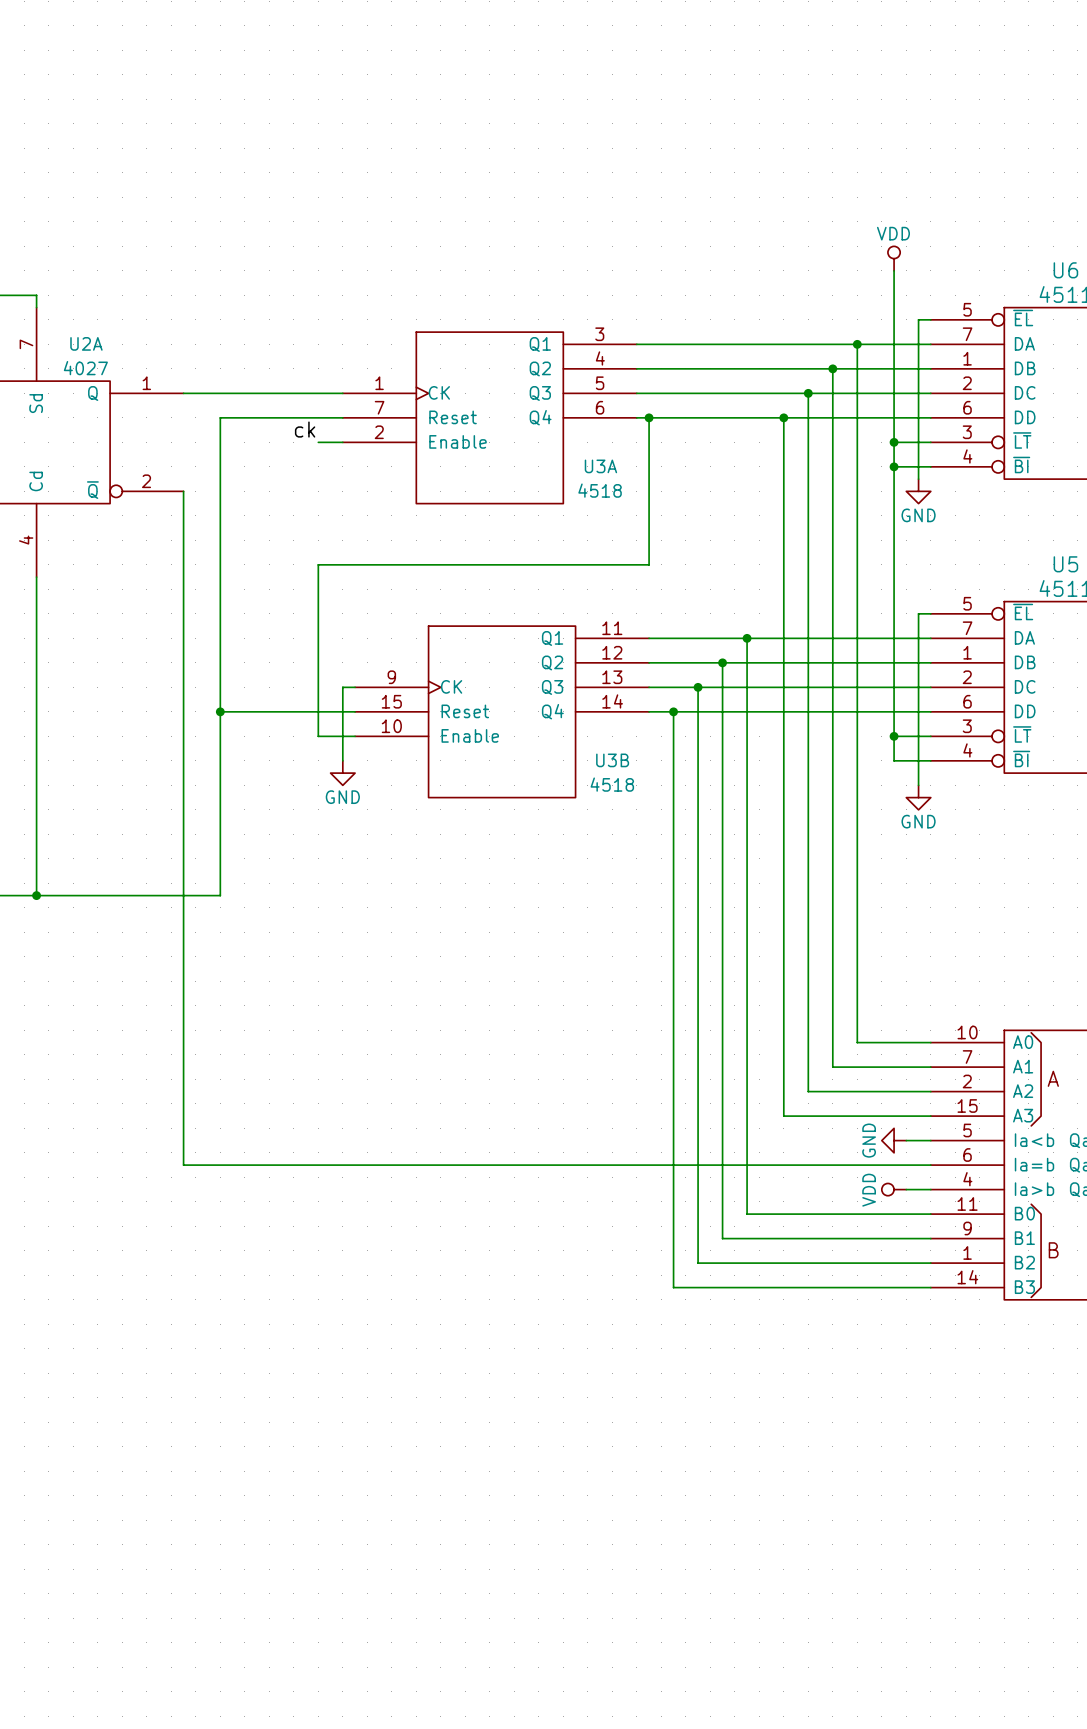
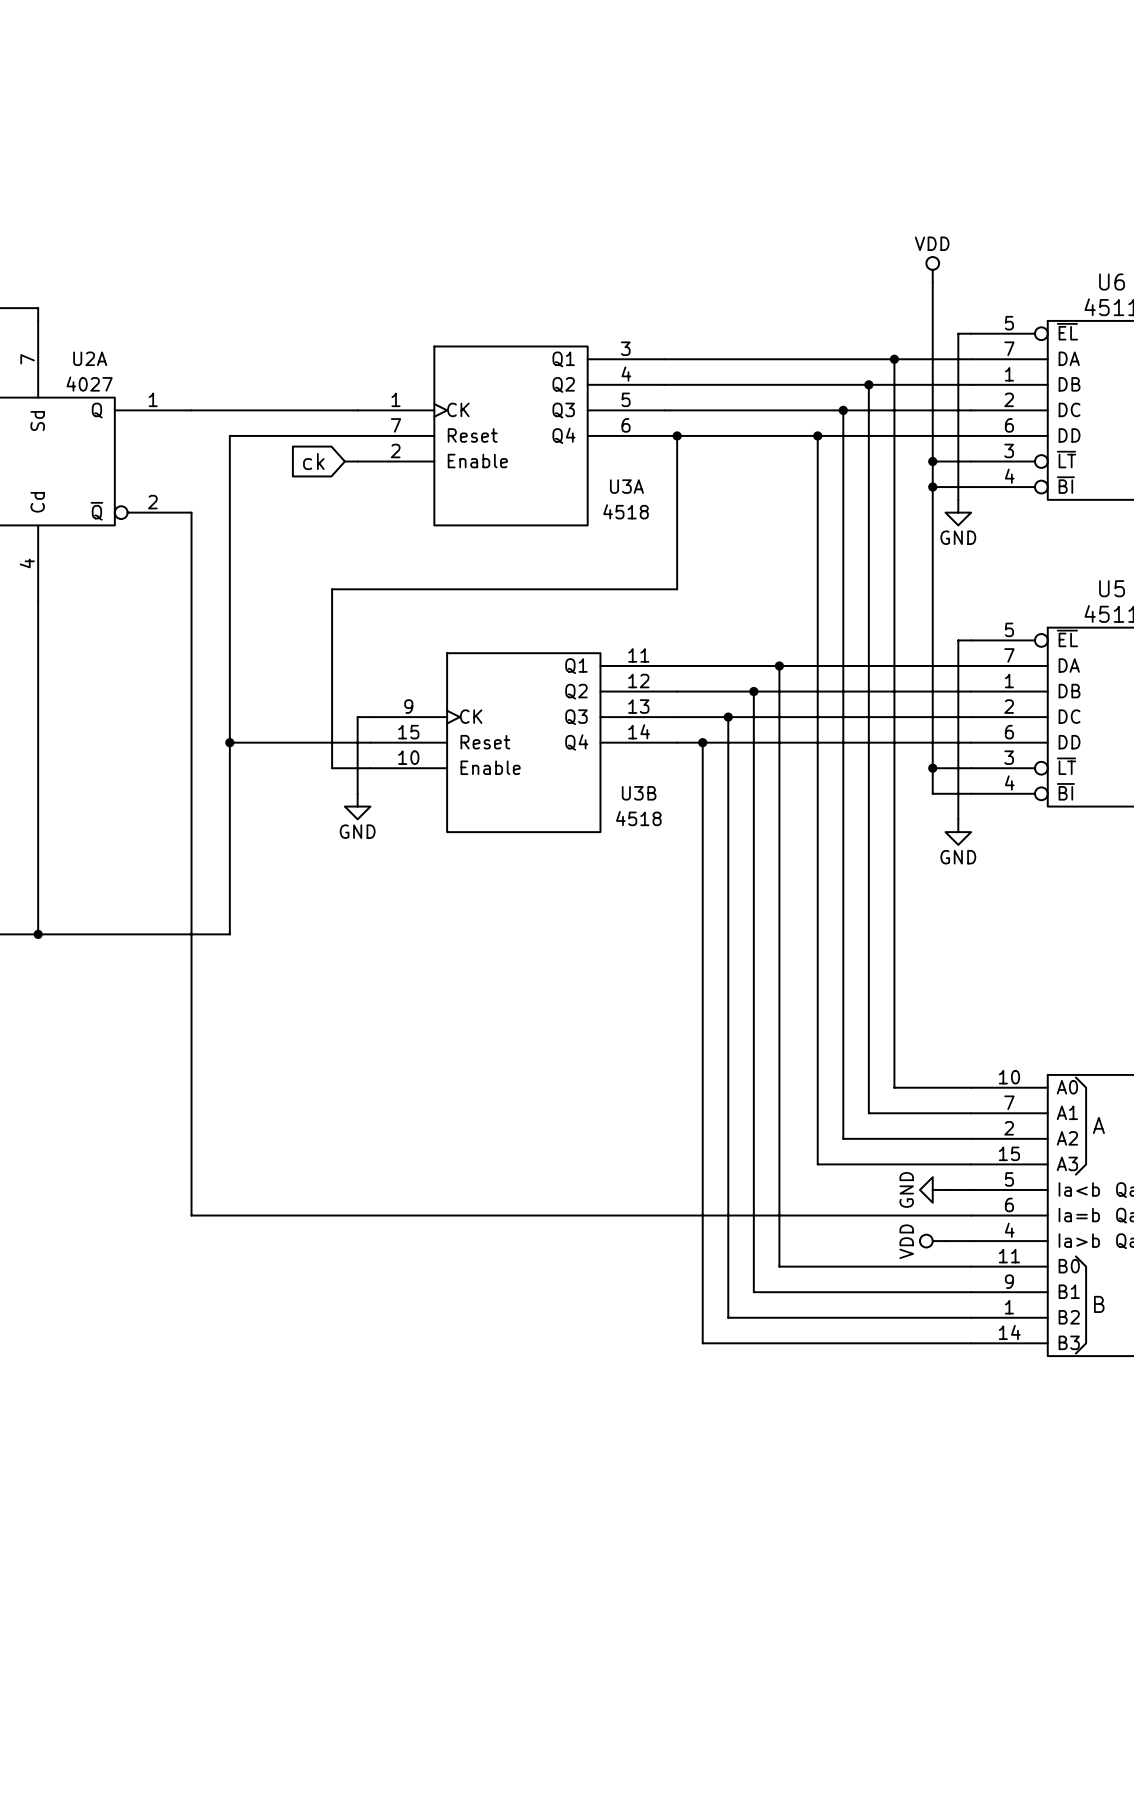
label: ck (305, 429) -> none
global label: none -> ck (313, 461)
wire: (318, 442) (330, 442) -> none

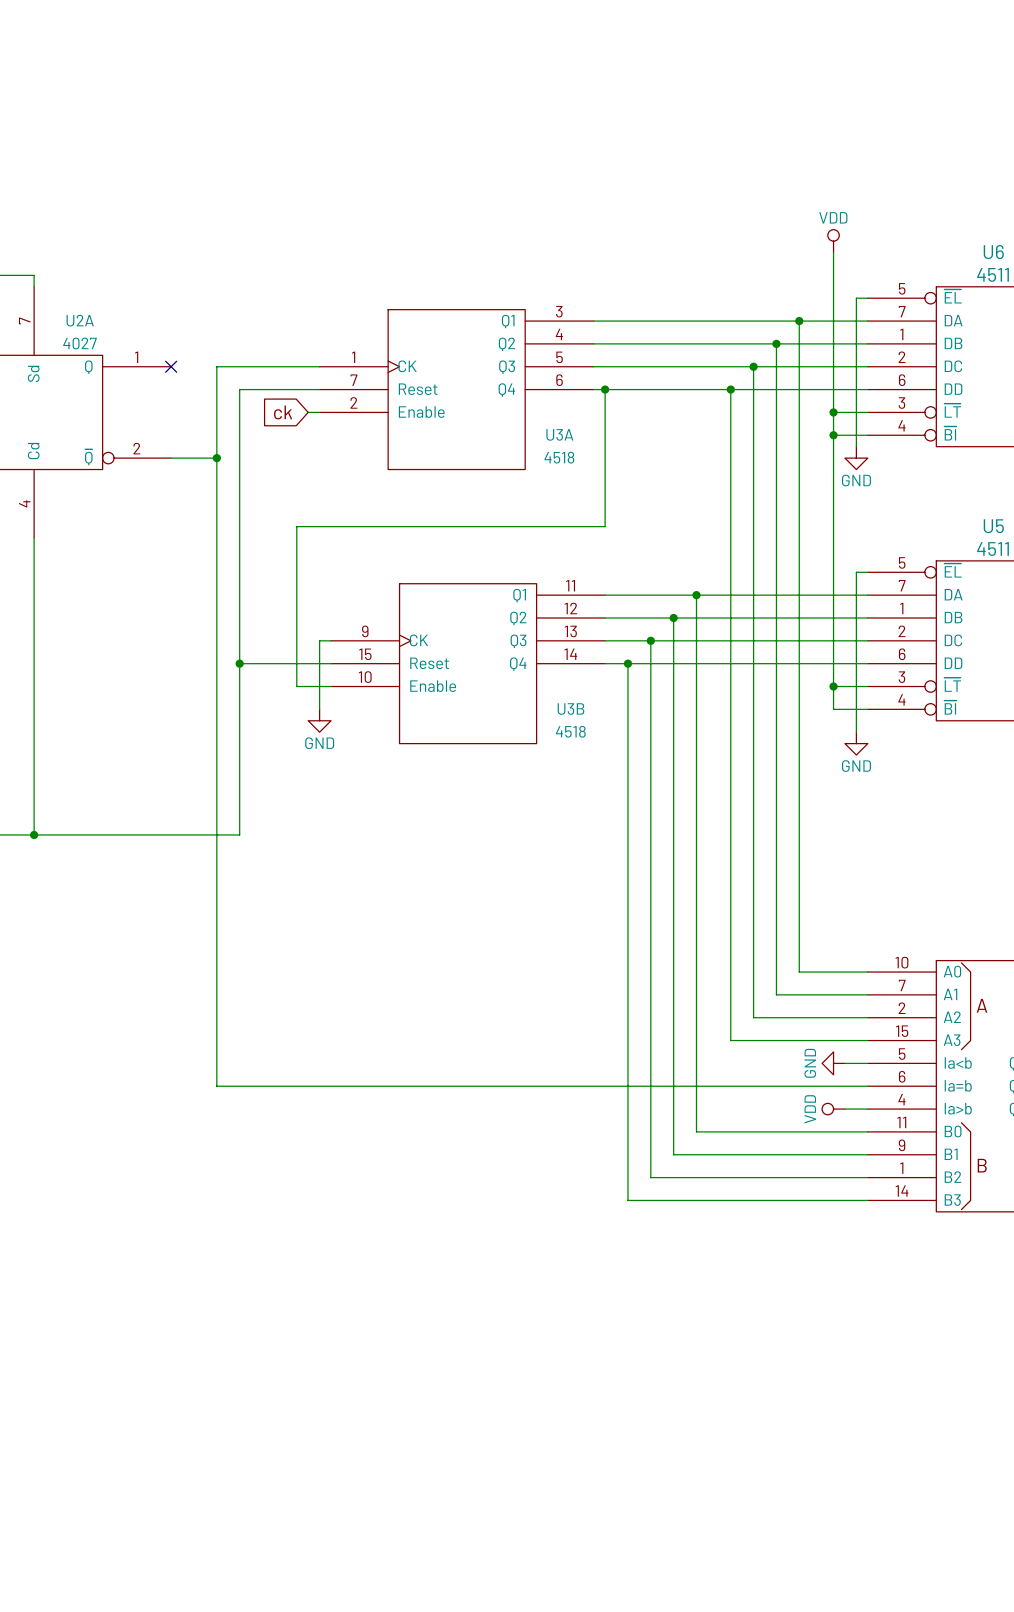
wire: (191, 410) (242, 410) -> (171, 458) (216, 458)
no-connect mark: none -> (171, 366)
wire: (268, 435) (229, 435) (229, 934) -> (239, 389) (239, 834) (205, 834)
wire: (191, 512) (191, 1215) (242, 1215) -> (216, 366) (216, 1086)
junction: none -> (216, 458)
wire: (229, 742) (268, 742) -> none
junction position: (229, 742) -> (239, 663)

